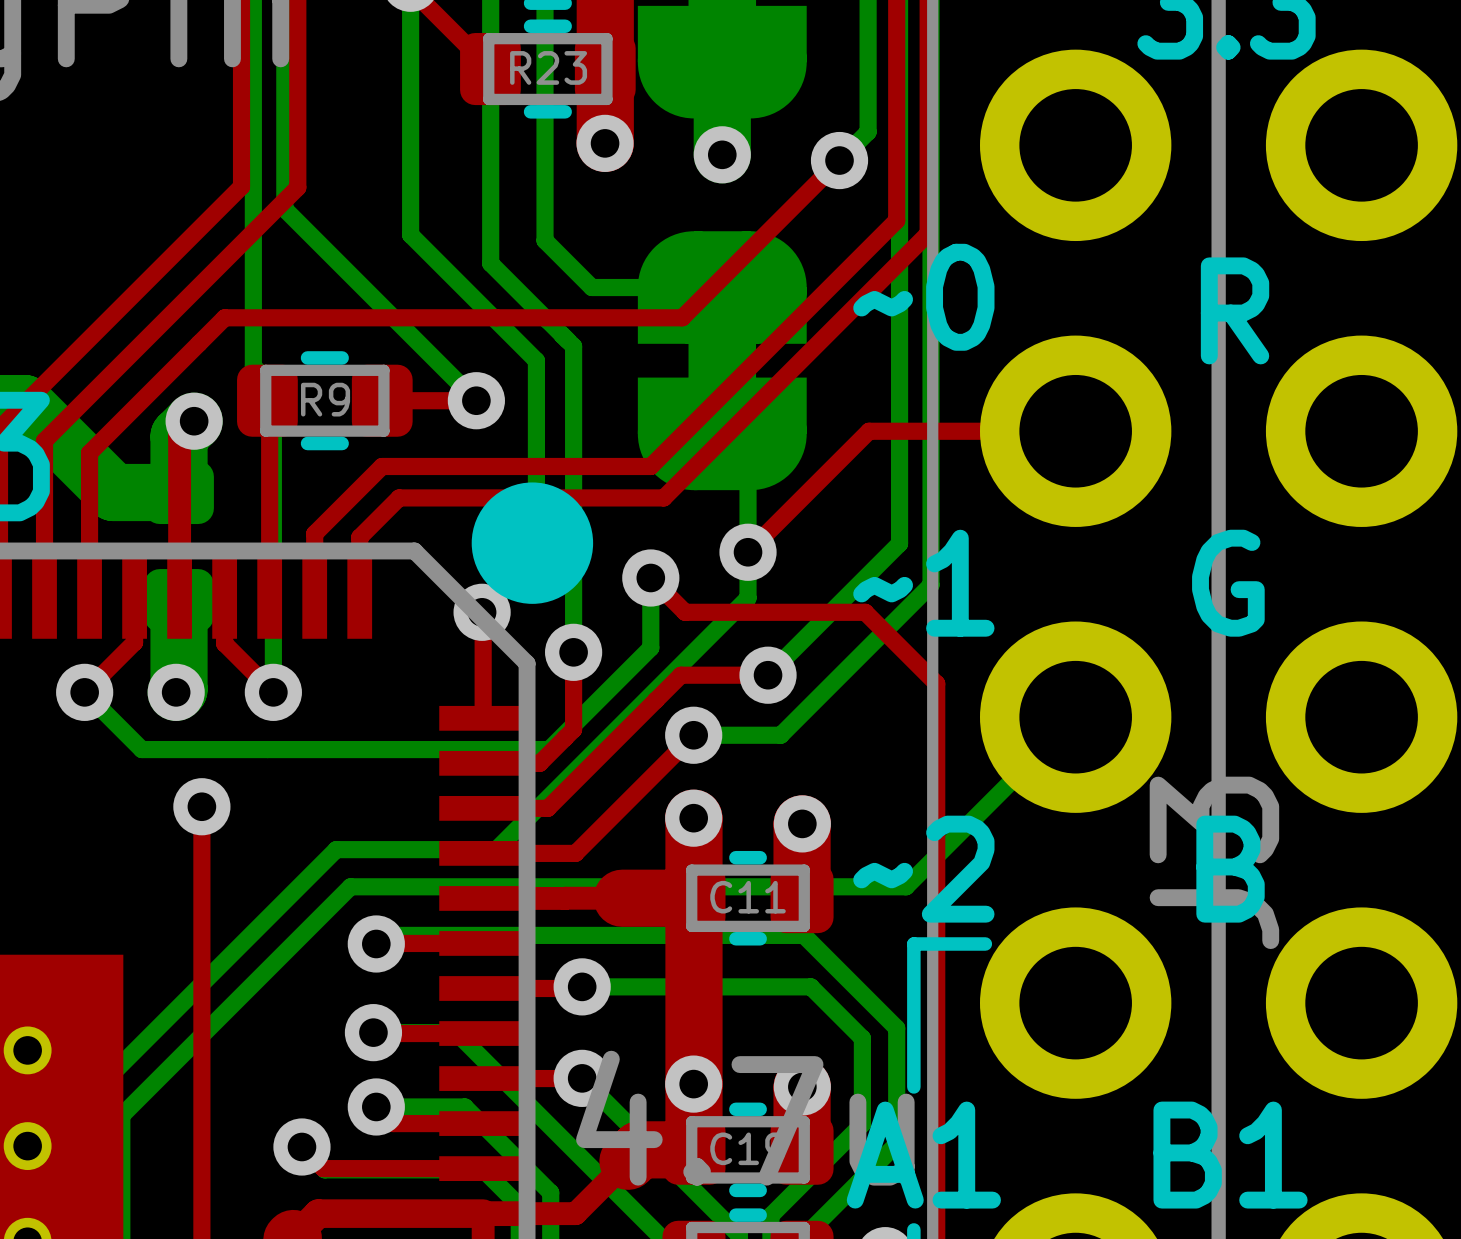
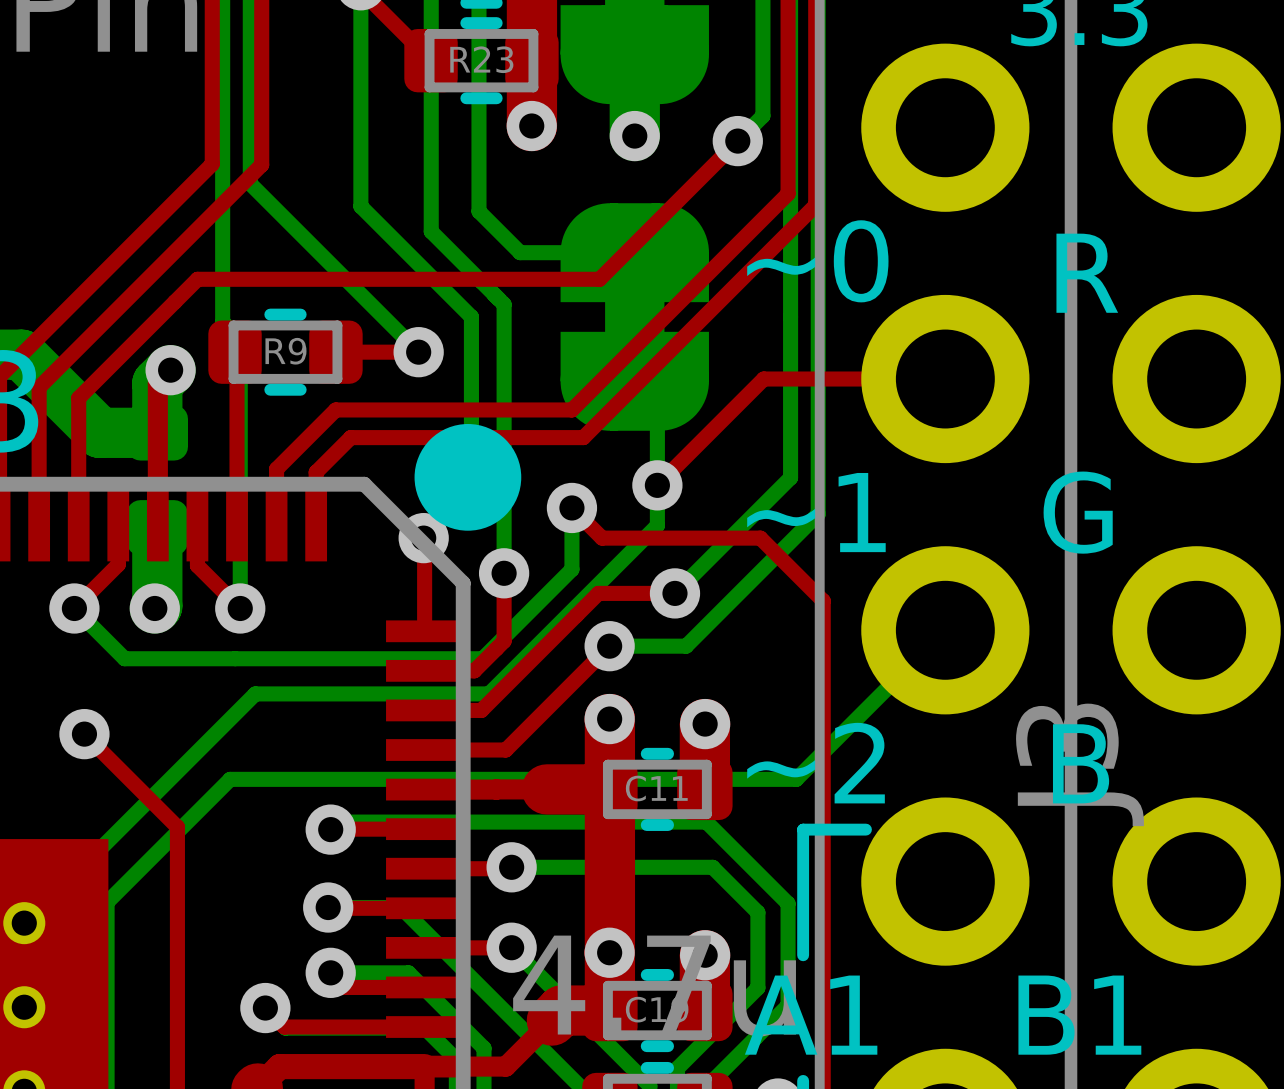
bottom track: (556, 789) (496, 849) (336, 849) (90, 1095) -> (489, 693) (255, 693) (79, 869) (79, 962)
top track: (201, 806) (201, 941) -> (84, 734) (177, 827)
via position: (201, 806) -> (84, 734)
bottom track: (350, 886) (121, 1115) -> (308, 779) (230, 779) (107, 902) (107, 980)

